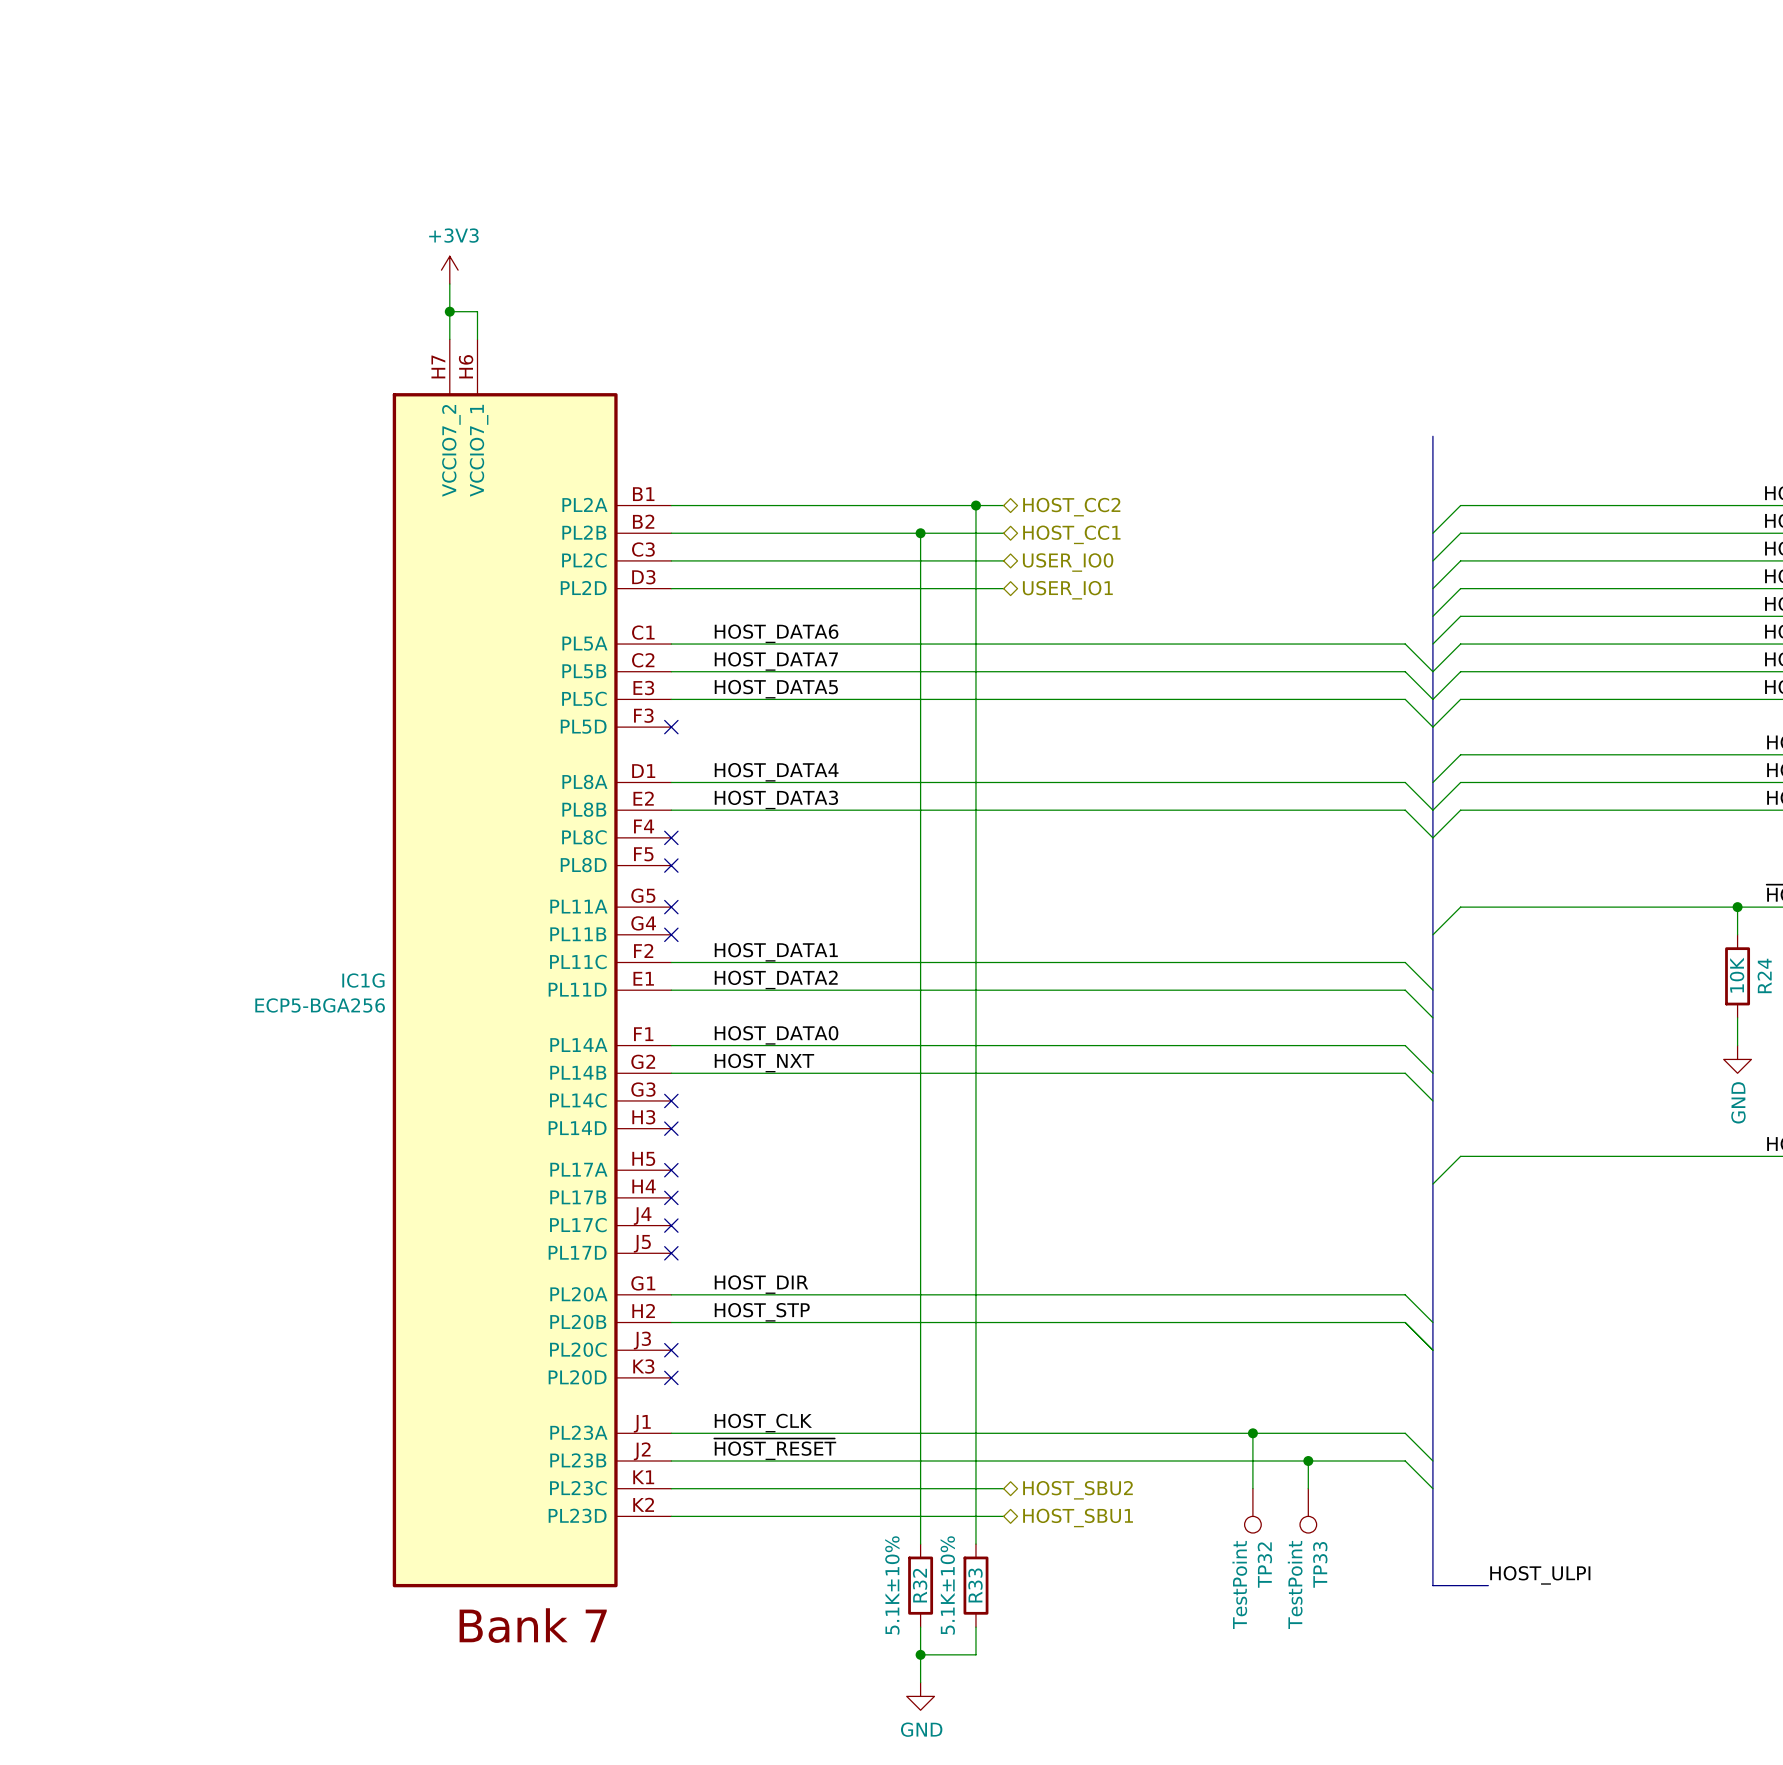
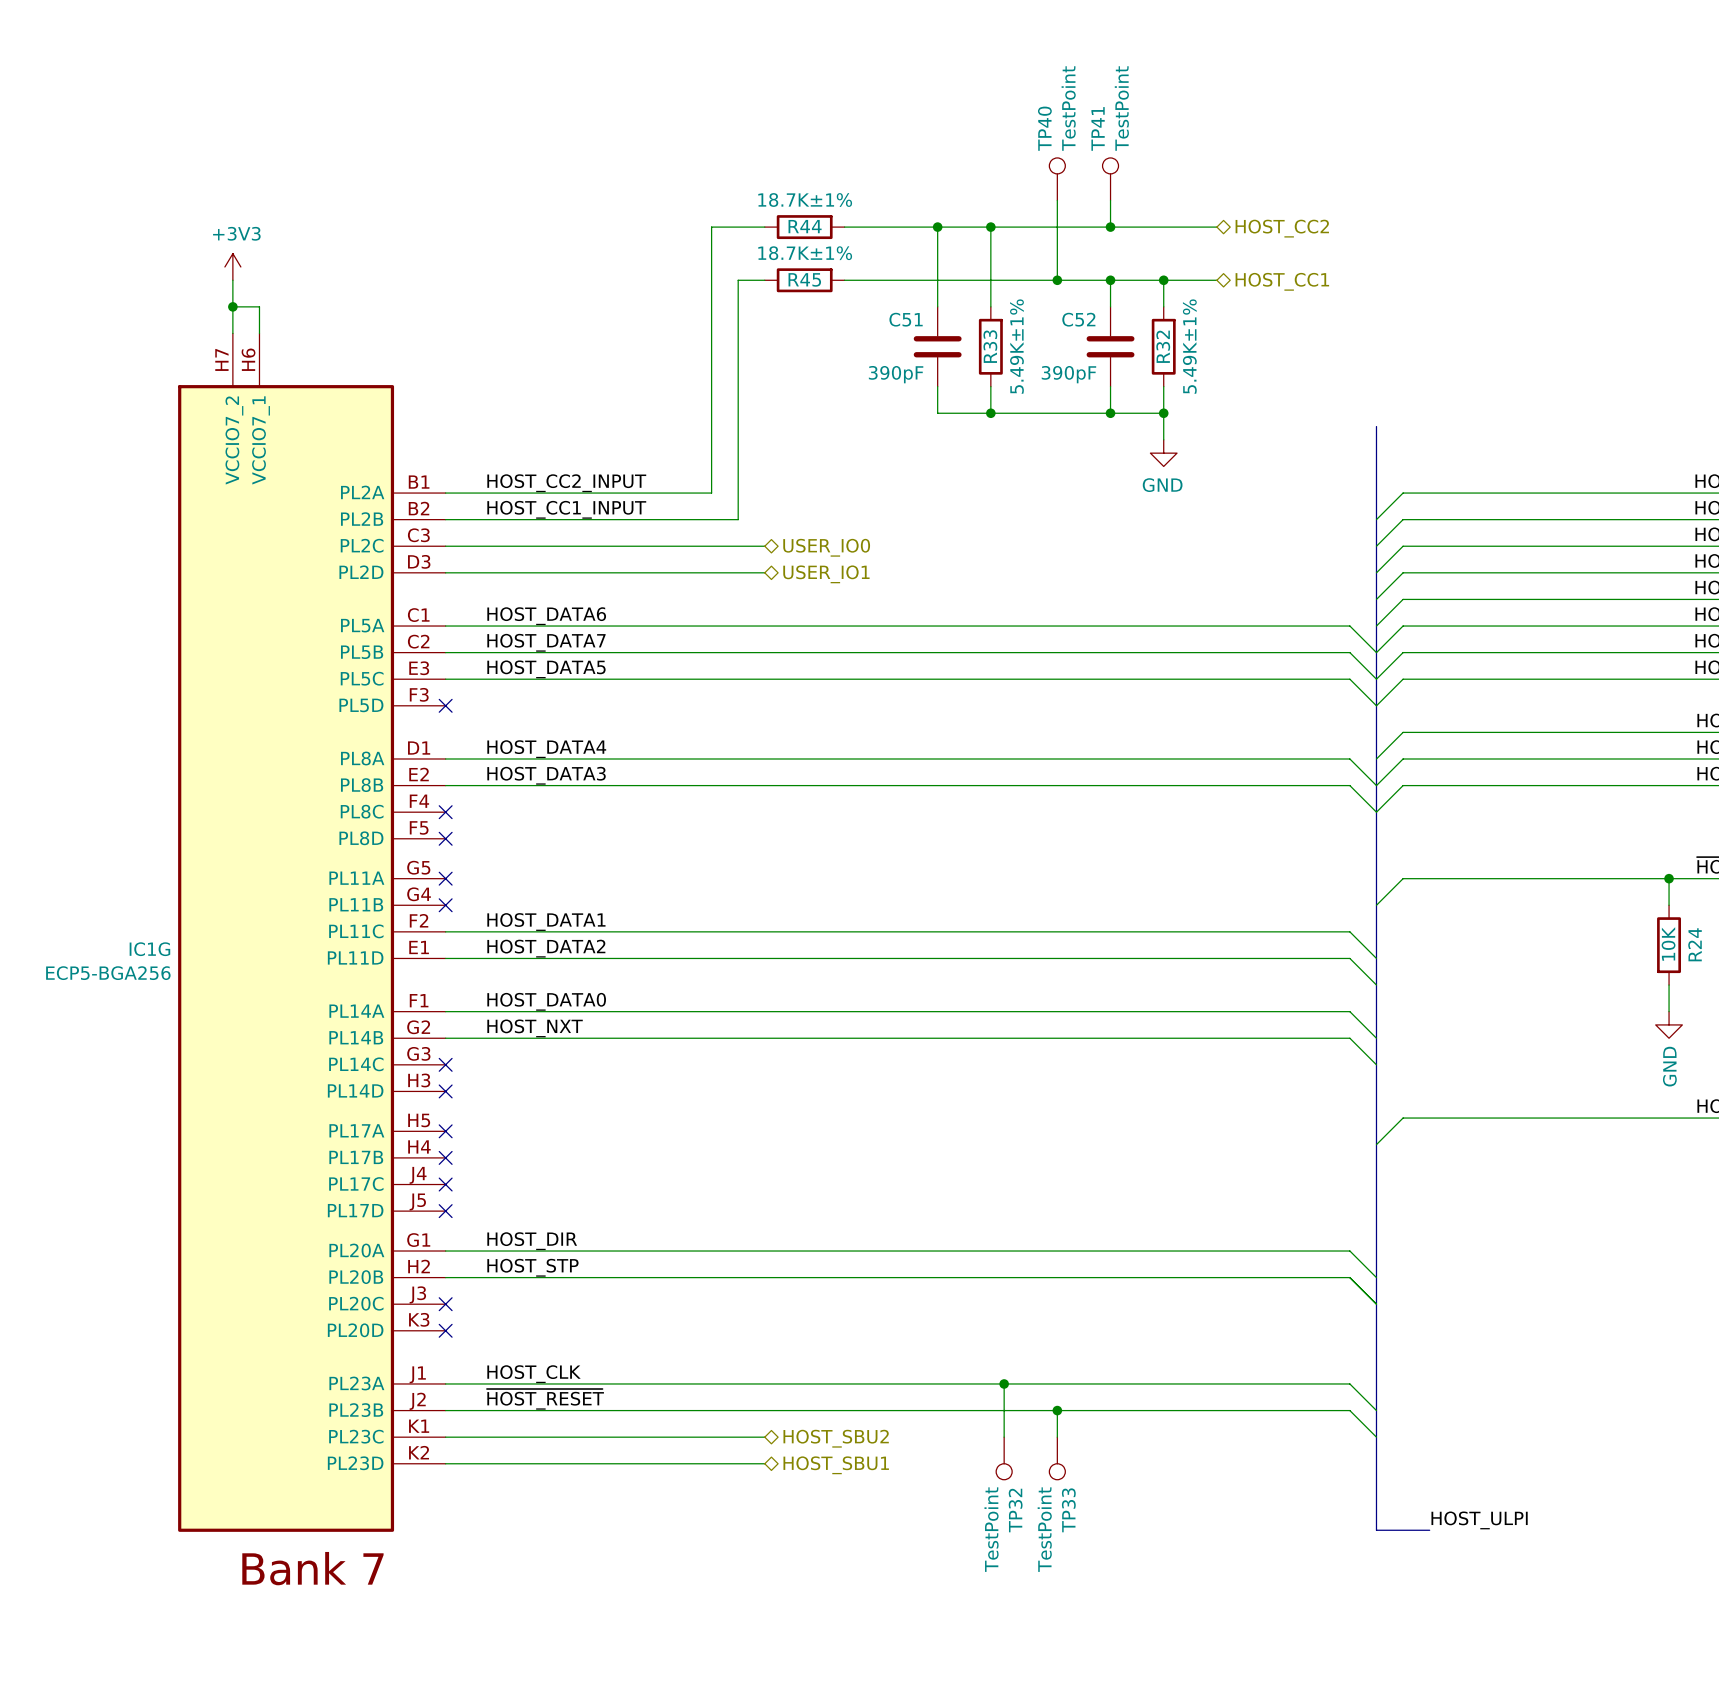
TP40: none -> TestPoint (1057, 179)
TP41: none -> TestPoint (1110, 179)
wire: none -> (1057, 200) (1057, 280)
wire: none -> (1110, 200) (1110, 227)
R44: none -> 18.7K±1% (804, 227)
wire: none -> (844, 227) (1216, 227)
wire: none -> (937, 227) (937, 306)
junction: none -> (937, 227)
wire: none -> (990, 227) (990, 306)
junction: none -> (990, 227)
junction: none -> (1110, 227)
hierarchical label: none -> HOST_CC2 (1282, 228)
power symbol position: +3V3 (449, 270) -> +3V3 (232, 266)
wire: (449, 283) (449, 339) -> (232, 280) (232, 333)
R45: none -> 18.7K±1% (804, 280)
wire: none -> (844, 280) (1216, 280)
junction: none -> (1057, 280)
wire: none -> (1110, 280) (1110, 306)
junction: none -> (1110, 280)
wire: none -> (1163, 280) (1163, 306)
junction: none -> (1163, 280)
hierarchical label: none -> HOST_CC1 (1282, 281)
junction: none -> (232, 306)
wire: (449, 311) (477, 311) (477, 339) -> (232, 306) (259, 306) (259, 333)
junction: (449, 311) -> none
C51: none -> 390pF (937, 346)
C52: none -> 390pF (1110, 346)
wire: none -> (937, 386) (937, 413) (1163, 413)
wire: none -> (990, 386) (990, 413)
wire: none -> (1110, 386) (1110, 413)
wire: none -> (1163, 386) (1163, 439)
junction: none -> (990, 413)
junction: none -> (1110, 413)
junction: none -> (1163, 413)
power symbol: none -> GND (1163, 453)
label: none -> HOST_CC2_INPUT (566, 483)
wire: (740, 505) (1003, 505) -> (711, 493) (711, 227) (764, 227)
wire: (975, 505) (975, 1544) -> none
junction: (975, 505) -> none
hierarchical label: HOST_CC2 (1071, 507) -> none
label: none -> HOST_CC1_INPUT (566, 509)
wire: (768, 533) (1003, 533) -> (738, 519) (738, 280) (764, 280)
wire: (920, 533) (920, 1544) -> none
junction: (920, 533) -> none
hierarchical label: HOST_CC1 (1071, 534) -> none
wire: (795, 560) (1003, 560) -> none
hierarchical label position: USER_IO0 (1068, 562) -> USER_IO0 (826, 547)
wire: (795, 588) (1003, 588) -> none
hierarchical label position: USER_IO1 (1067, 590) -> USER_IO1 (826, 574)
label position: HOST_DATA6 (776, 633) -> HOST_DATA6 (546, 616)
label position: HOST_DATA7 (776, 661) -> HOST_DATA7 (546, 642)
label position: HOST_DATA5 (776, 689) -> HOST_DATA5 (546, 669)
no-connect mark: none -> (445, 705)
no-connect mark: (671, 727) -> none
label position: HOST_DATA4 (776, 772) -> HOST_DATA4 (546, 749)
label position: HOST_DATA3 (776, 799) -> HOST_DATA3 (546, 775)
no-connect mark: none -> (445, 812)
no-connect mark: (671, 837) -> none
no-connect mark: none -> (445, 838)
no-connect mark: (671, 865) -> none
no-connect mark: none -> (445, 878)
no-connect mark: (671, 907) -> none
no-connect mark: none -> (445, 905)
no-connect mark: (671, 934) -> none
label position: HOST_DATA1 (776, 952) -> HOST_DATA1 (546, 922)
IC1G position: (532, 963) -> (311, 932)
label position: HOST_DATA2 (776, 979) -> HOST_DATA2 (546, 948)
label position: HOST_DATA0 (776, 1035) -> HOST_DATA0 (546, 1001)
label position: HOST_NXT (764, 1063) -> HOST_NXT (535, 1028)
no-connect mark: none -> (445, 1064)
no-connect mark: (671, 1100) -> none
no-connect mark: none -> (445, 1091)
no-connect mark: (671, 1128) -> none
no-connect mark: none -> (445, 1131)
no-connect mark: (671, 1170) -> none
no-connect mark: none -> (445, 1157)
no-connect mark: (671, 1197) -> none
no-connect mark: none -> (445, 1184)
no-connect mark: (671, 1225) -> none
no-connect mark: none -> (445, 1211)
no-connect mark: (671, 1253) -> none
label position: HOST_DIR (761, 1284) -> HOST_DIR (532, 1241)
label position: HOST_STP (762, 1312) -> HOST_STP (532, 1267)
no-connect mark: none -> (445, 1304)
no-connect mark: (671, 1350) -> none
no-connect mark: none -> (445, 1330)
no-connect mark: (671, 1377) -> none
label position: HOST_CLK (763, 1423) -> HOST_CLK (534, 1374)
junction: none -> (1004, 1383)
wire: (1252, 1433) (1252, 1488) -> (1004, 1383) (1004, 1437)
junction: (1252, 1433) -> none
label position: ~{HOST_RESET} (775, 1449) -> ~{HOST_RESET} (545, 1399)
junction: none -> (1057, 1410)
wire: (1308, 1461) (1308, 1488) -> (1057, 1410) (1057, 1437)
junction: (1308, 1461) -> none
wire: (795, 1488) (1003, 1488) -> none
hierarchical label position: HOST_SBU2 (1077, 1490) -> HOST_SBU2 (836, 1438)
TP32 position: (1252, 1510) -> (1004, 1458)
TP33 position: (1308, 1510) -> (1057, 1458)
wire: (795, 1516) (1003, 1516) -> none
hierarchical label position: HOST_SBU1 (1078, 1517) -> HOST_SBU1 (836, 1465)
R32 value: 5.1K±10% (892, 1585) -> 5.49K±1% (1189, 346)
R32 position: (920, 1585) -> (1163, 346)
R33 value: 5.1K±10% (947, 1585) -> 5.49K±1% (1016, 346)
R33 position: (975, 1585) -> (990, 346)
wire: (920, 1627) (920, 1682) -> none
wire: (975, 1627) (975, 1654) (920, 1654) -> none
junction: (920, 1654) -> none
power symbol: GND (920, 1696) -> none

